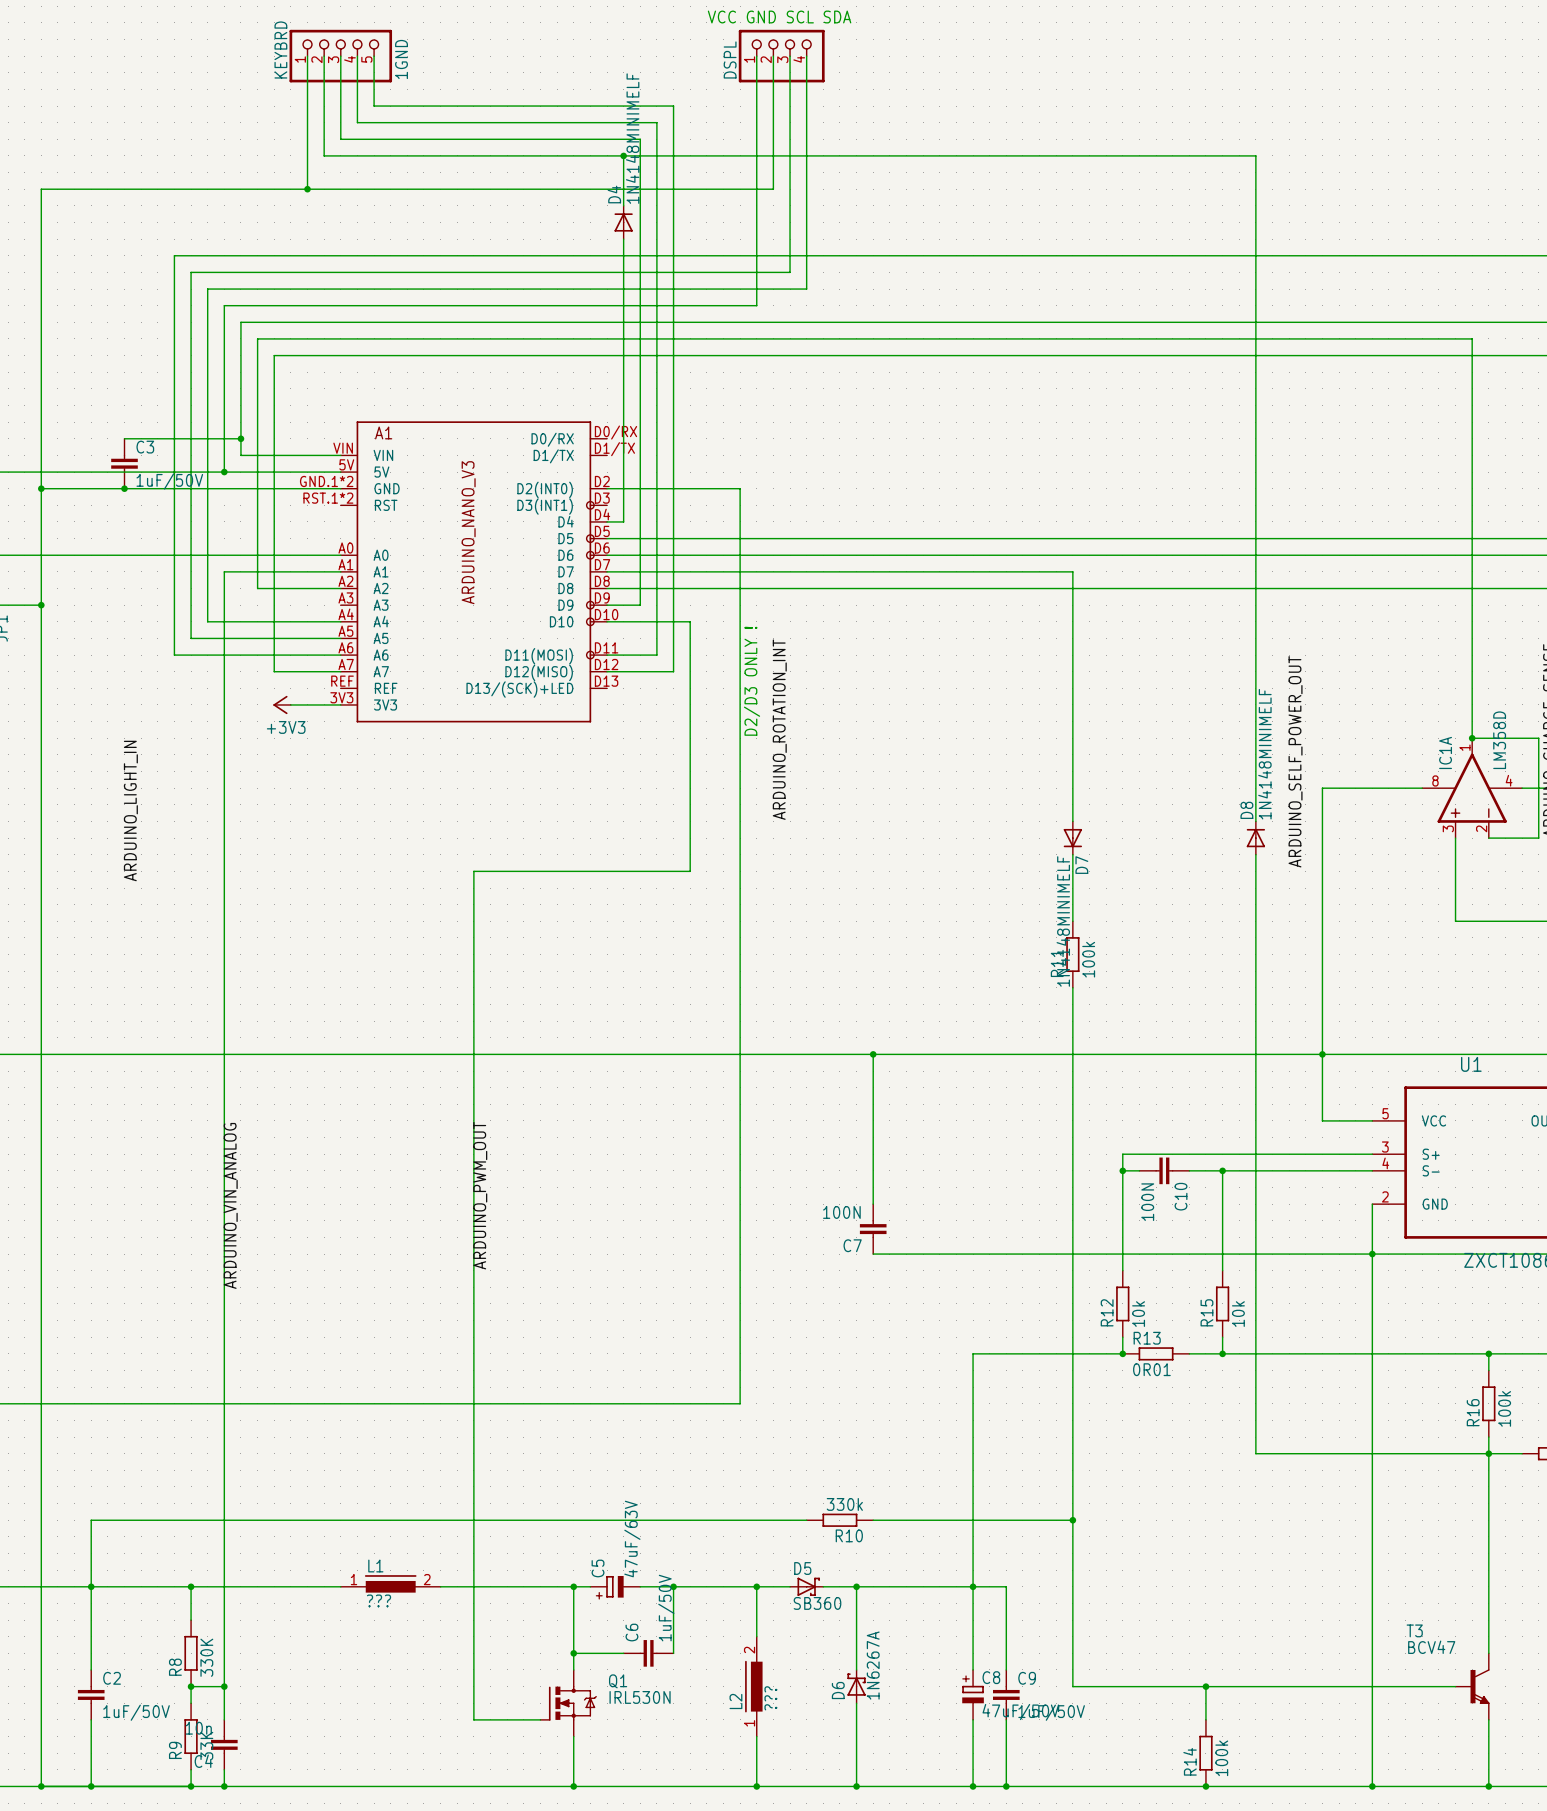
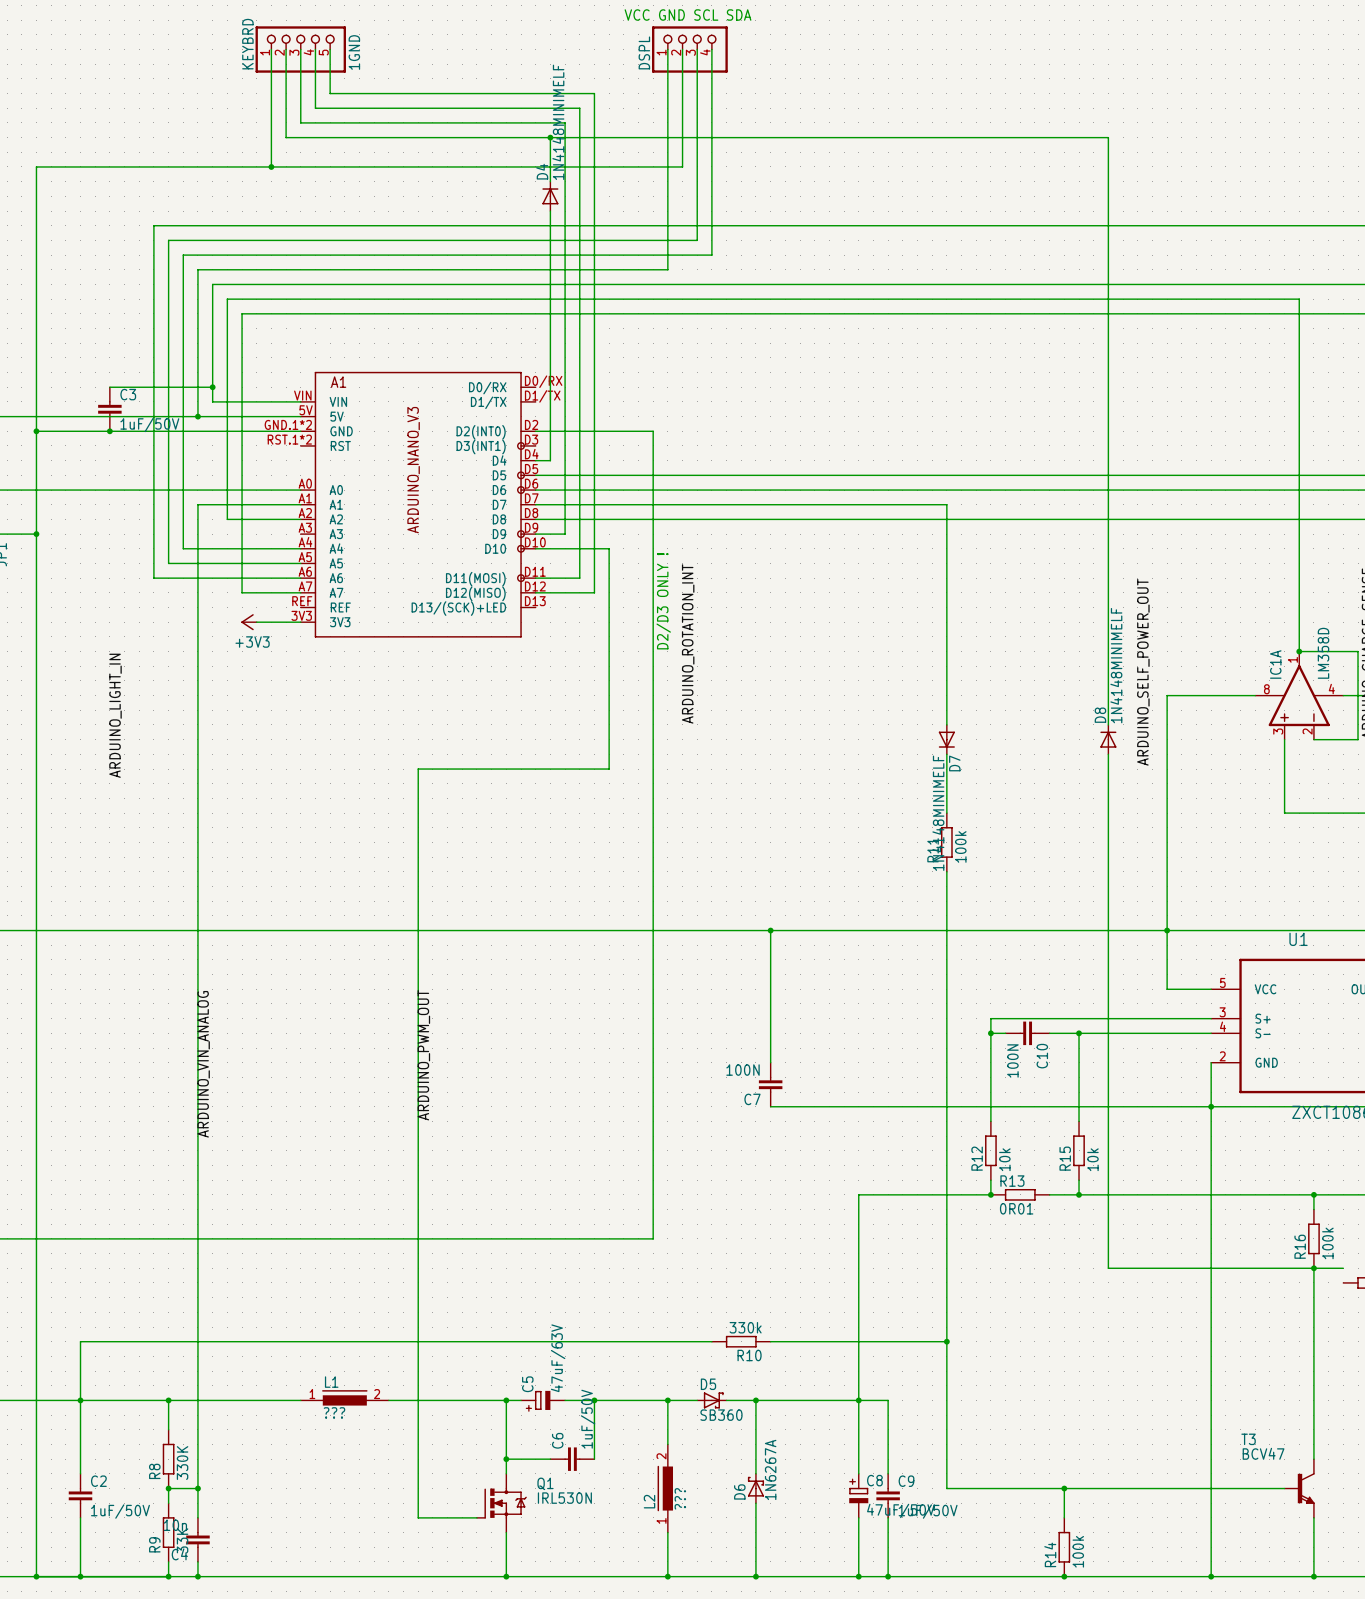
wire: (1255, 1437) (1255, 1453) (1522, 1453) -> (1108, 1268) (1343, 1268)
junction position: (1488, 1453) -> (1313, 1268)

